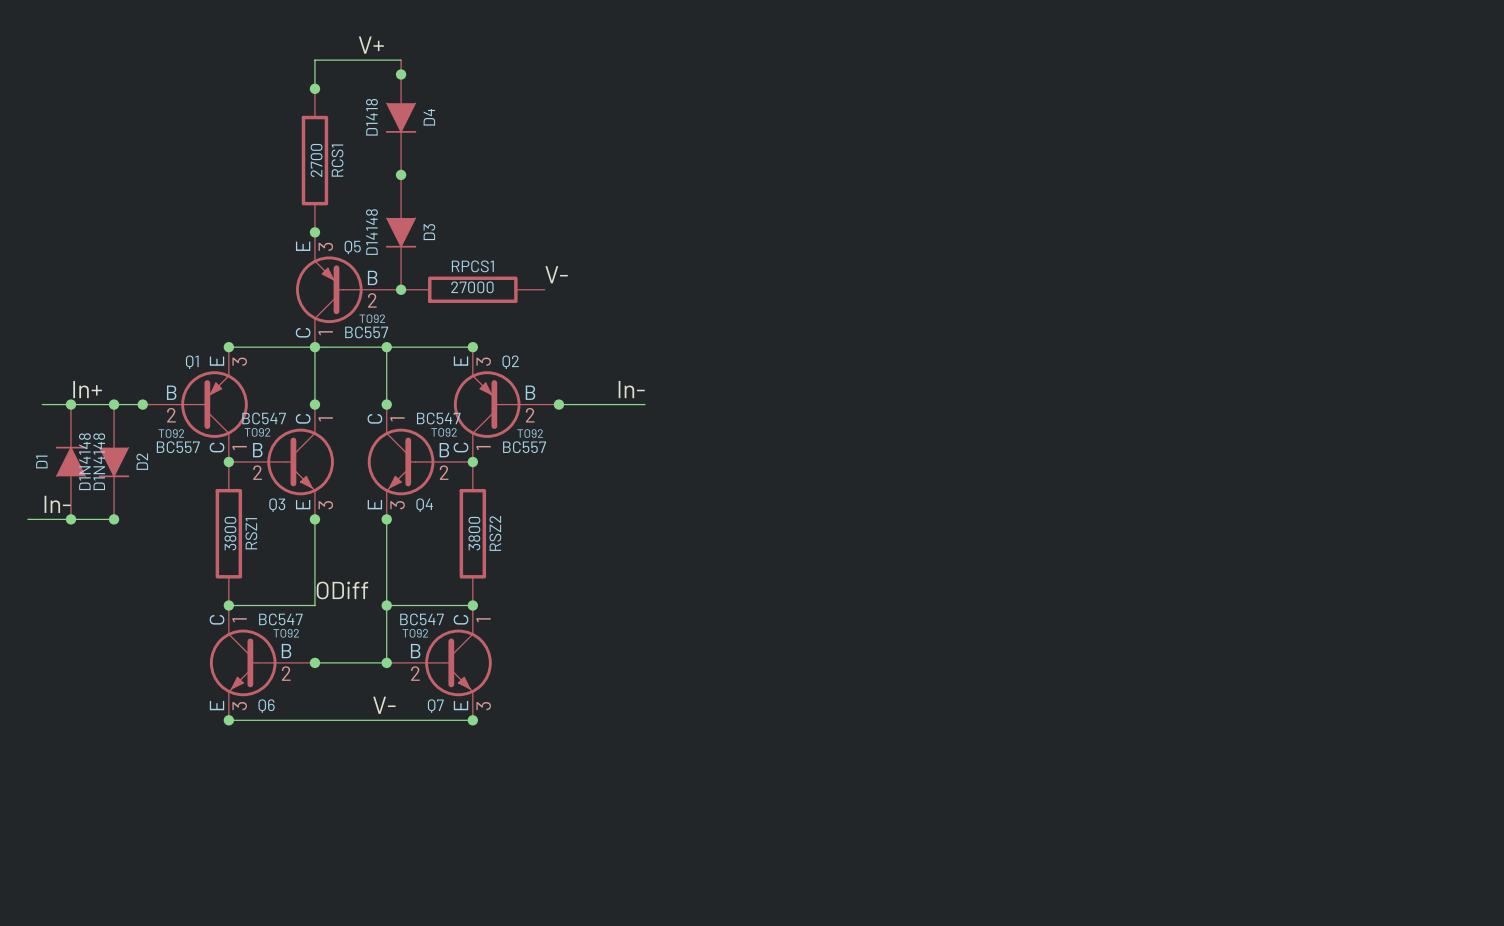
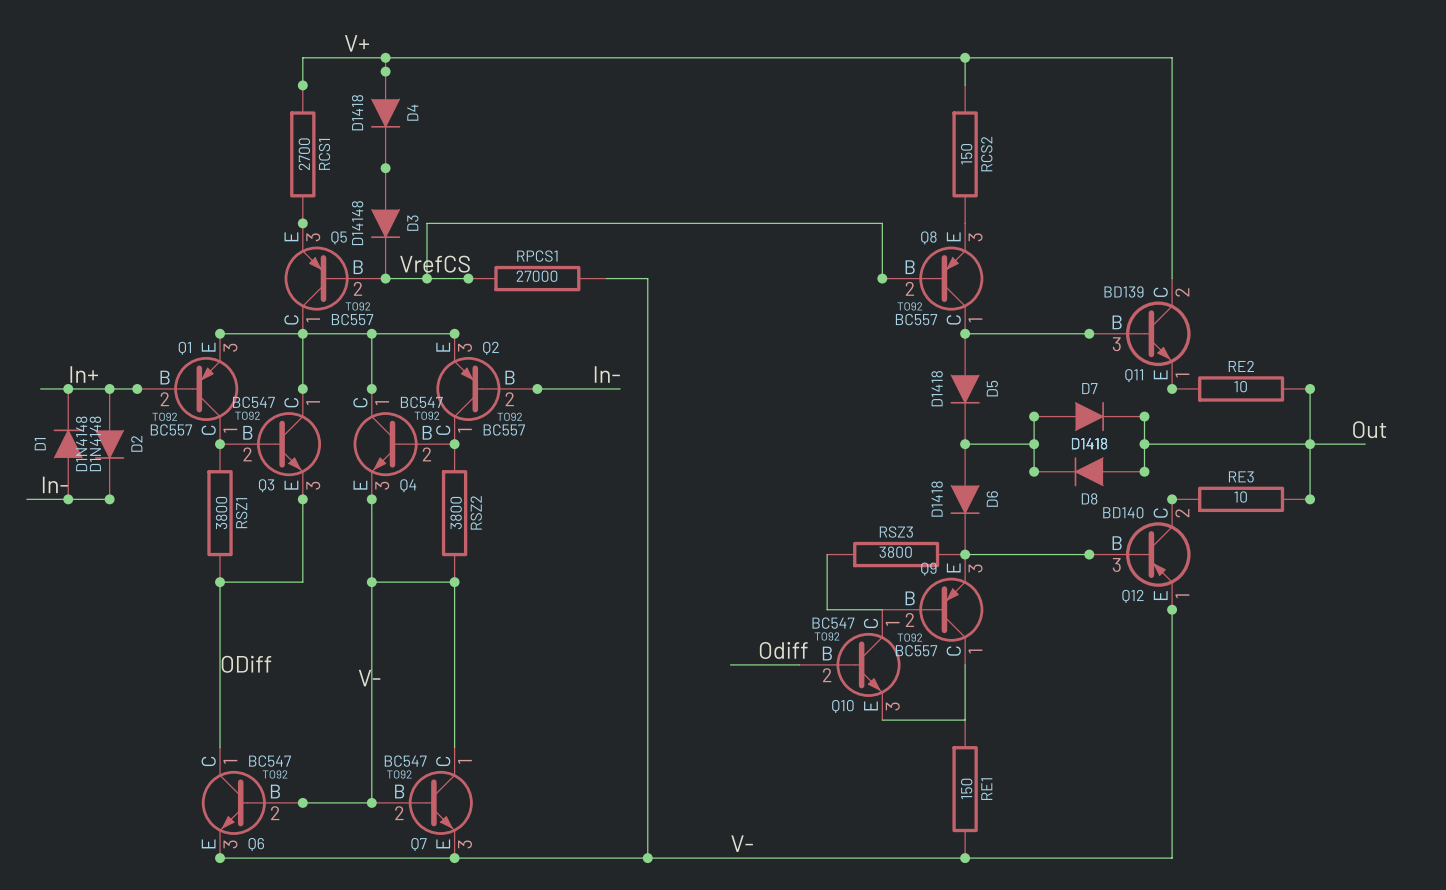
wire: none -> (385, 57) (1172, 57) (1172, 278)
junction: none -> (385, 57)
wire: none -> (965, 57) (965, 85)
junction: none -> (965, 57)
RCS2: none -> 150 (965, 154)
label: none -> VrefCS (435, 264)
label: V- (556, 274) -> none
wire: none -> (385, 278) (468, 278)
wire: none -> (426, 278) (426, 223) (882, 223) (882, 278)
junction: none -> (426, 278)
RPCS1 position: (472, 289) -> (537, 278)
junction: none -> (468, 278)
wire: none -> (606, 278) (647, 278) (647, 858)
junction: none -> (882, 278)
Q8: none -> BC557 (932, 278)
wire: none -> (965, 333) (1089, 333)
junction: none -> (965, 333)
junction: none -> (1089, 333)
Q11: none -> BD139 (1139, 333)
D5: none -> D1418 (965, 388)
junction: none -> (1172, 388)
RE2: none -> 10 (1241, 388)
wire: none -> (1310, 388) (1310, 499)
junction: none -> (1310, 388)
wire: none -> (1034, 416) (1034, 471)
junction: none -> (1034, 416)
D7: none -> D1418 (1089, 416)
wire: none -> (1144, 416) (1144, 471)
junction: none -> (1144, 416)
label: none -> Out (1369, 429)
wire: none -> (965, 444) (1034, 444)
junction: none -> (965, 444)
junction: none -> (1034, 444)
wire: none -> (1144, 444) (1365, 444)
junction: none -> (1144, 444)
junction: none -> (1310, 444)
junction: none -> (1034, 471)
D8: none -> D1418 (1089, 471)
junction: none -> (1144, 471)
D6: none -> D1418 (965, 499)
junction: none -> (1172, 499)
RE3: none -> 10 (1241, 499)
junction: none -> (1310, 499)
wire: none -> (827, 554) (827, 609) (882, 609)
RSZ3: none -> 3800 (896, 554)
wire: none -> (965, 554) (1089, 554)
junction: none -> (965, 554)
junction: none -> (1089, 554)
Q12: none -> BD140 (1139, 554)
label position: ODiff (342, 590) -> ODiff (246, 664)
wire: none -> (220, 582) (220, 747)
wire: none -> (454, 582) (454, 747)
Q9: none -> BC557 (932, 609)
wire: none -> (1172, 609) (1172, 858) (220, 858)
junction: none -> (1172, 609)
Q6 position: (262, 662) -> (252, 802)
wire: (314, 662) (386, 662) -> (302, 802) (371, 802) (371, 637)
junction: (314, 662) -> none
junction: (386, 662) -> none
Q7 position: (439, 662) -> (422, 802)
label: none -> Odiff (783, 650)
wire: none -> (730, 664) (799, 664)
Q10: none -> BC547 (850, 664)
wire: none -> (965, 664) (965, 720) (882, 720)
wire: (228, 720) (472, 720) -> none
junction: (228, 720) -> none
junction: (472, 720) -> none
RE1: none -> 150 (965, 789)
junction: none -> (302, 802)
junction: none -> (371, 802)
label: none -> V- (742, 843)
junction: none -> (220, 858)
junction: none -> (454, 858)
junction: none -> (647, 858)
junction: none -> (965, 858)

